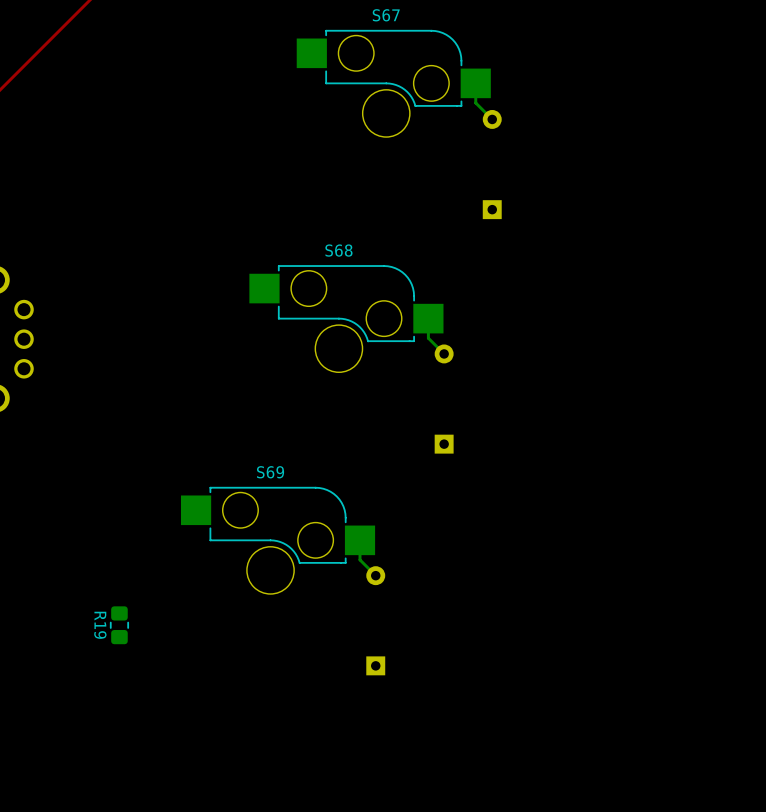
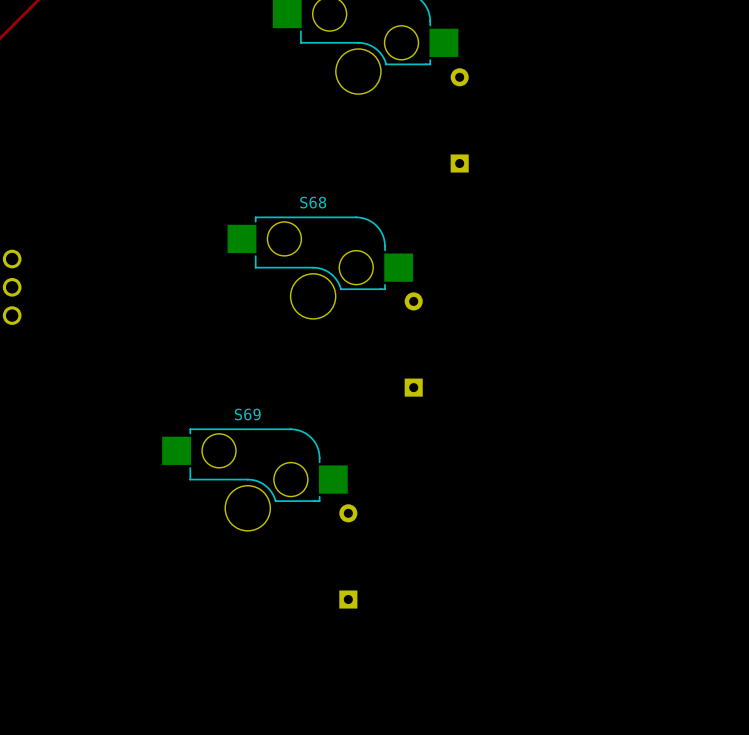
bottom track: (475, 83) (475, 102) (492, 119) -> none
bottom track: (428, 318) (428, 338) (444, 353) -> none
bottom track: (360, 540) (360, 559) (375, 575) -> none
R19: (119, 625) -> none

